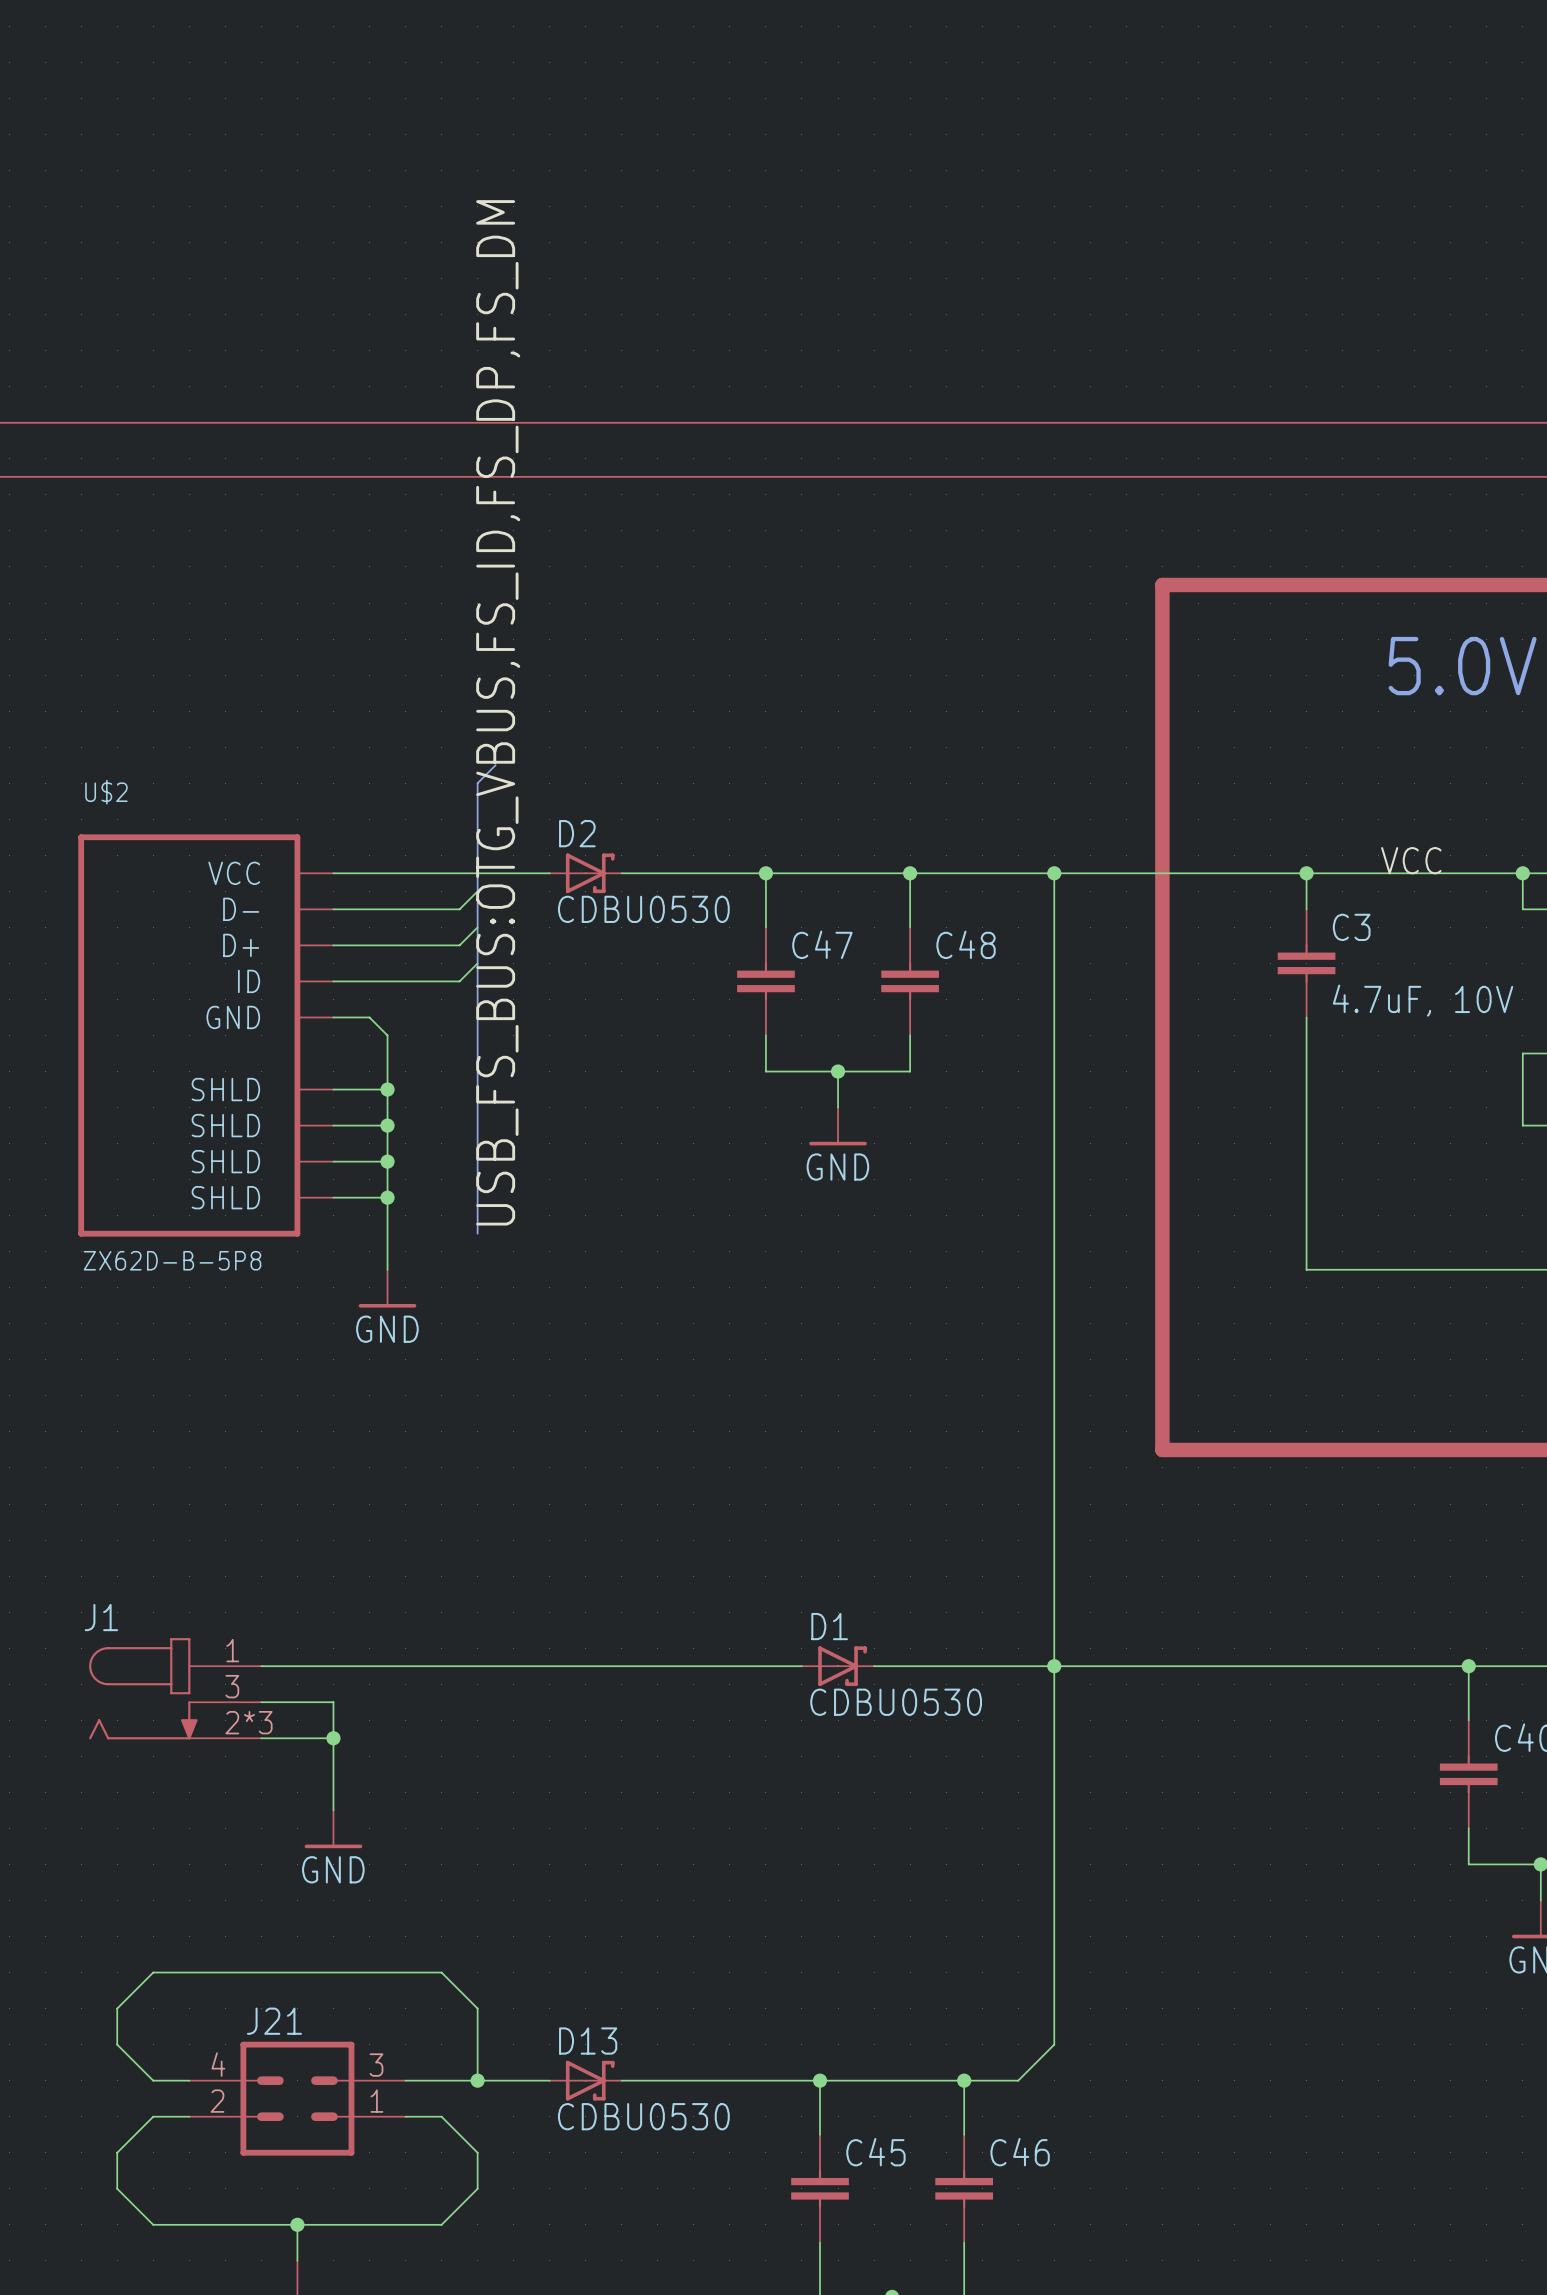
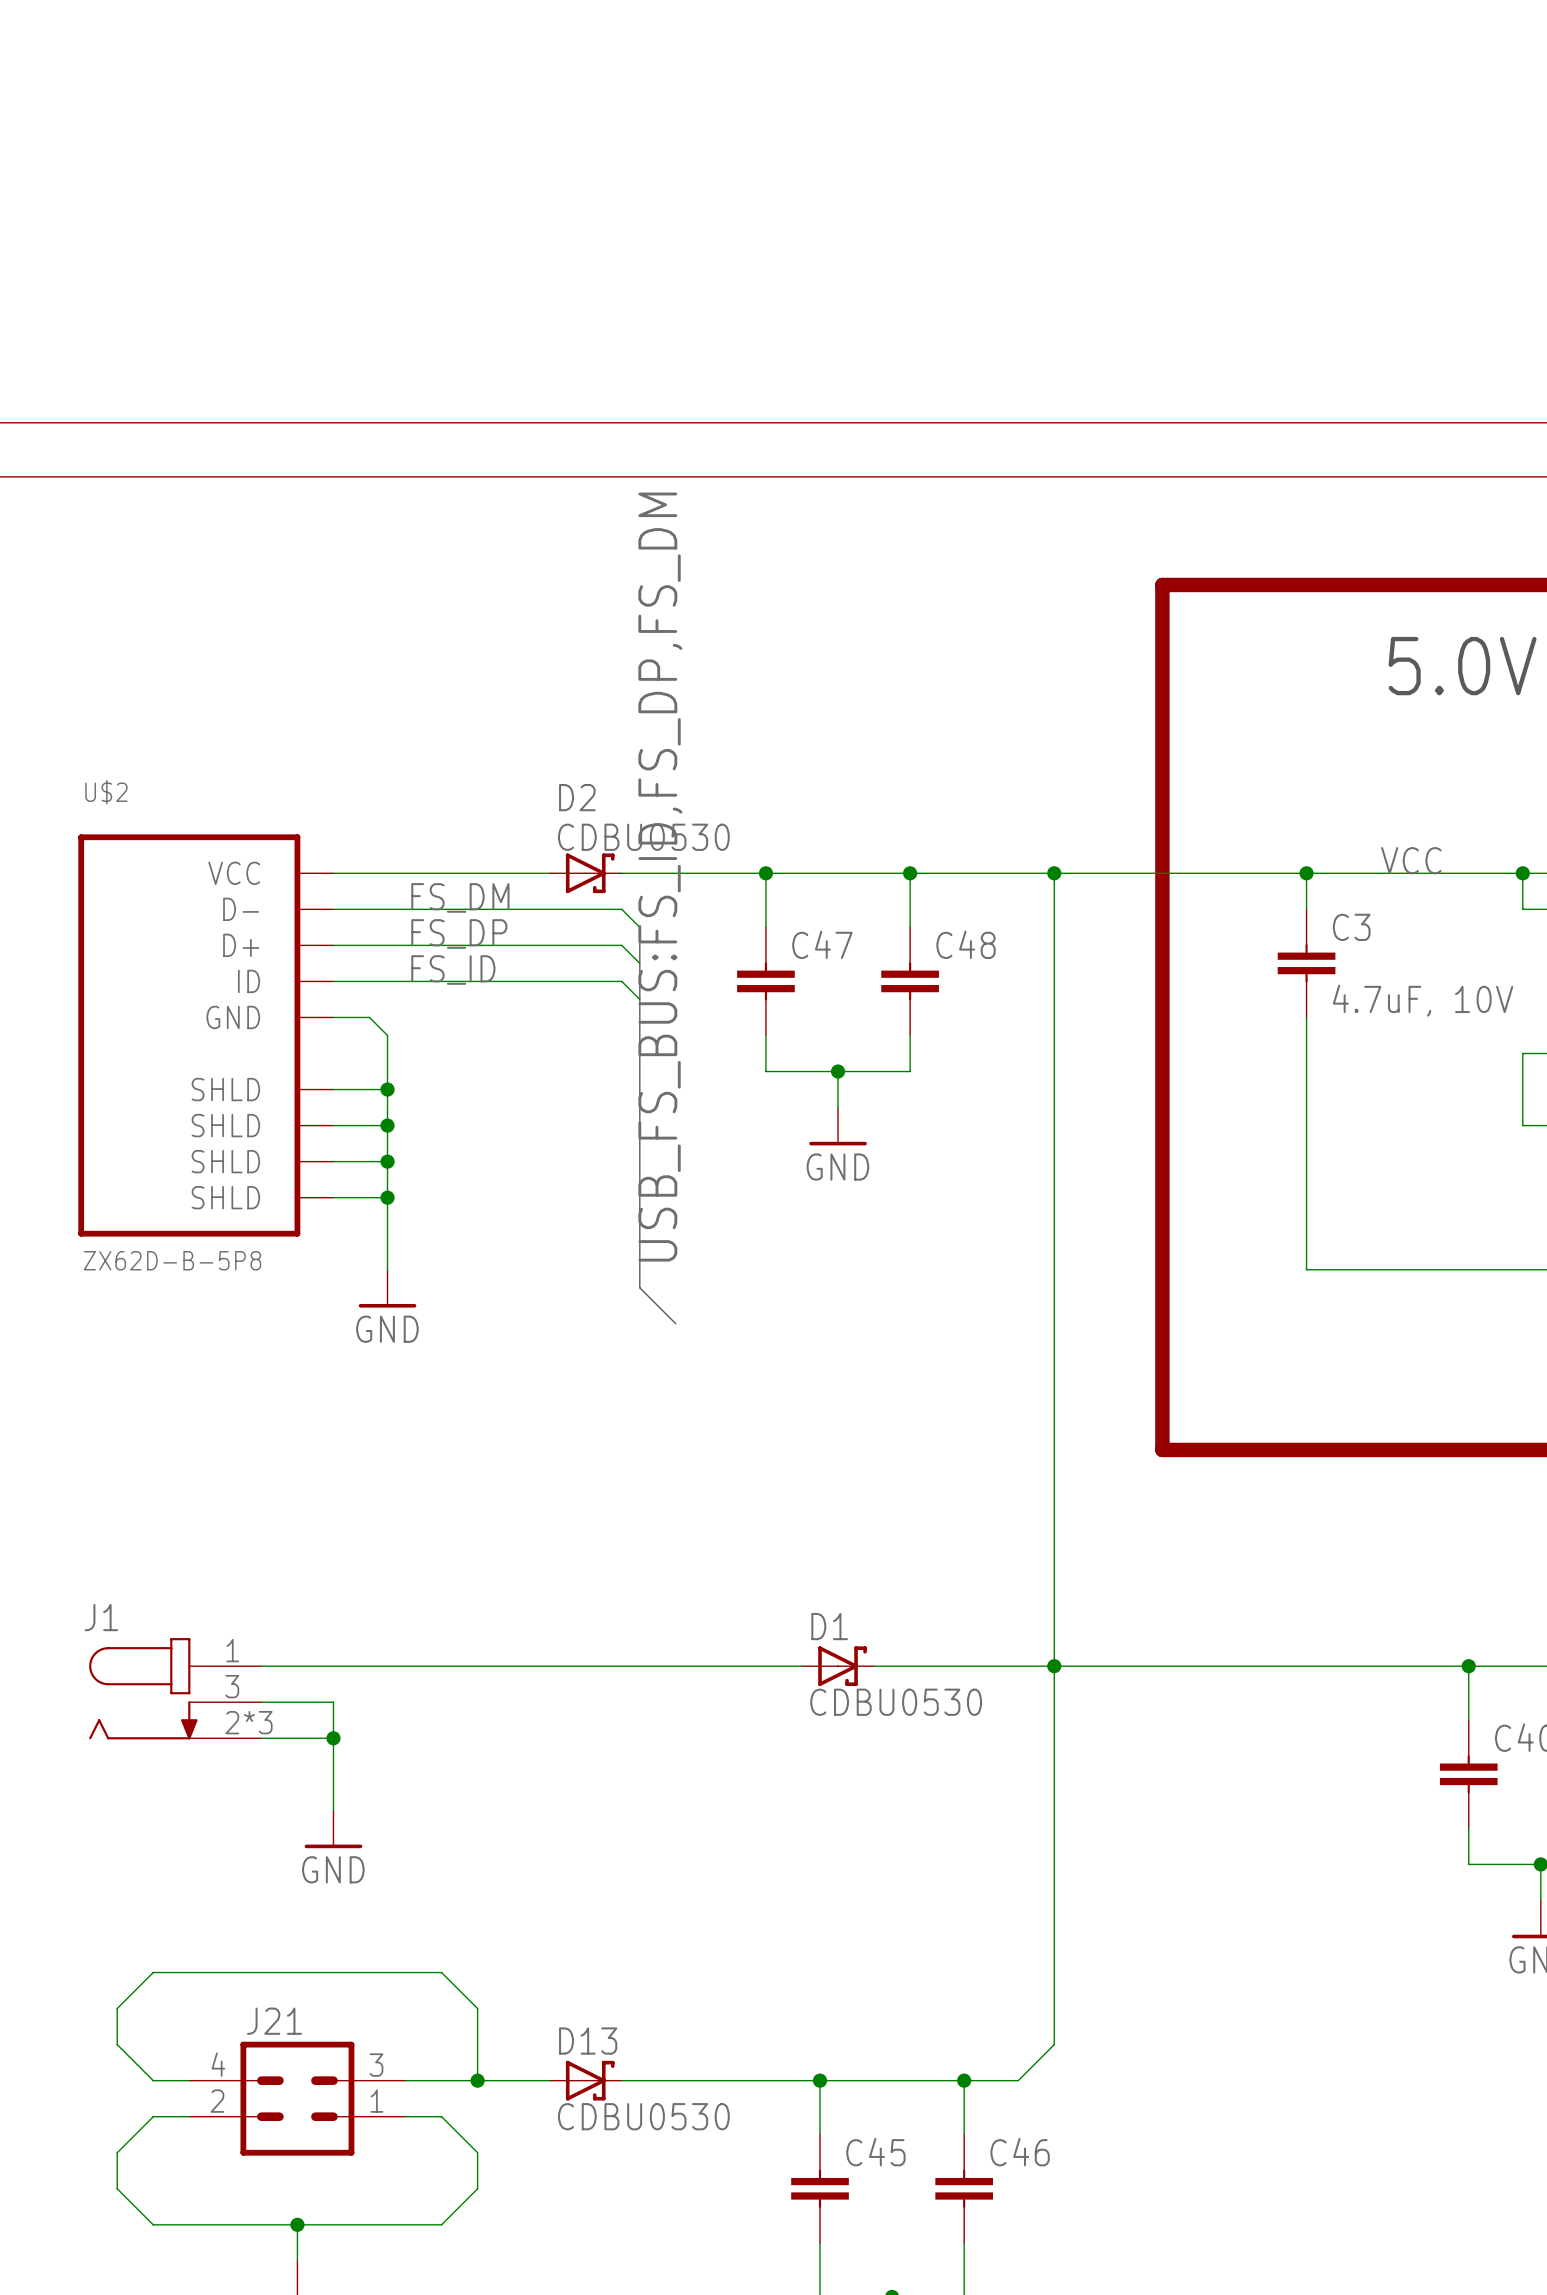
label: USB_FS_BUS:OTG_VBUS,FS_ID,FS_DP,FS_DM (498, 712) -> none
bus: (495, 765) (477, 783) (477, 1233) -> none
D2 name position: D2 (577, 833) -> D2 (577, 797)
label: none -> USB_FS_BUS:FS_ID,FS_DP,FS_DM (660, 877)
wire: (477, 891) (459, 909) -> (639, 927) (621, 909) (459, 909)
label: none -> FS_DM (460, 897)
D2 value position: CDBU0530 (643, 909) -> CDBU0530 (643, 837)
wire: (477, 927) (459, 945) -> (639, 963) (621, 945) (459, 945)
bus: none -> (639, 927) (639, 1287) (675, 1323)
label: none -> FS_DP (459, 933)
wire: (477, 963) (459, 981) -> (639, 999) (621, 981) (459, 981)
label: none -> FS_ID (453, 970)

